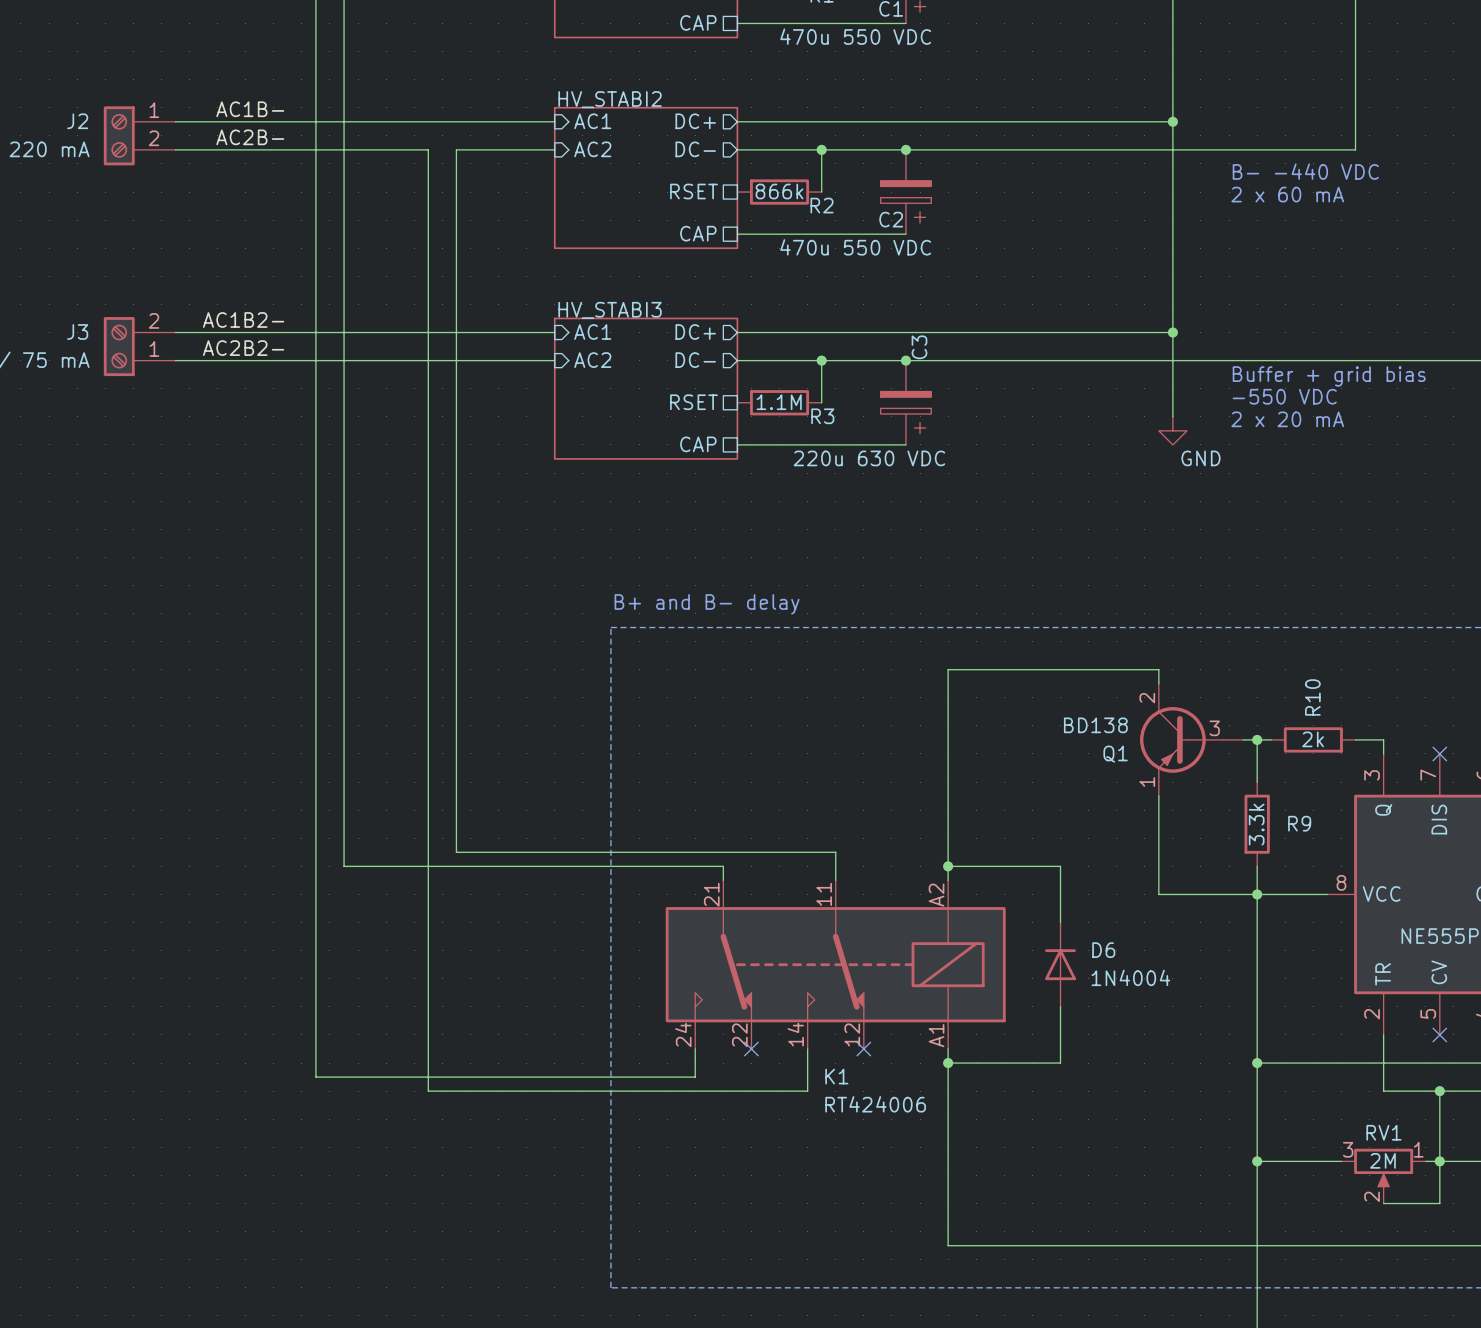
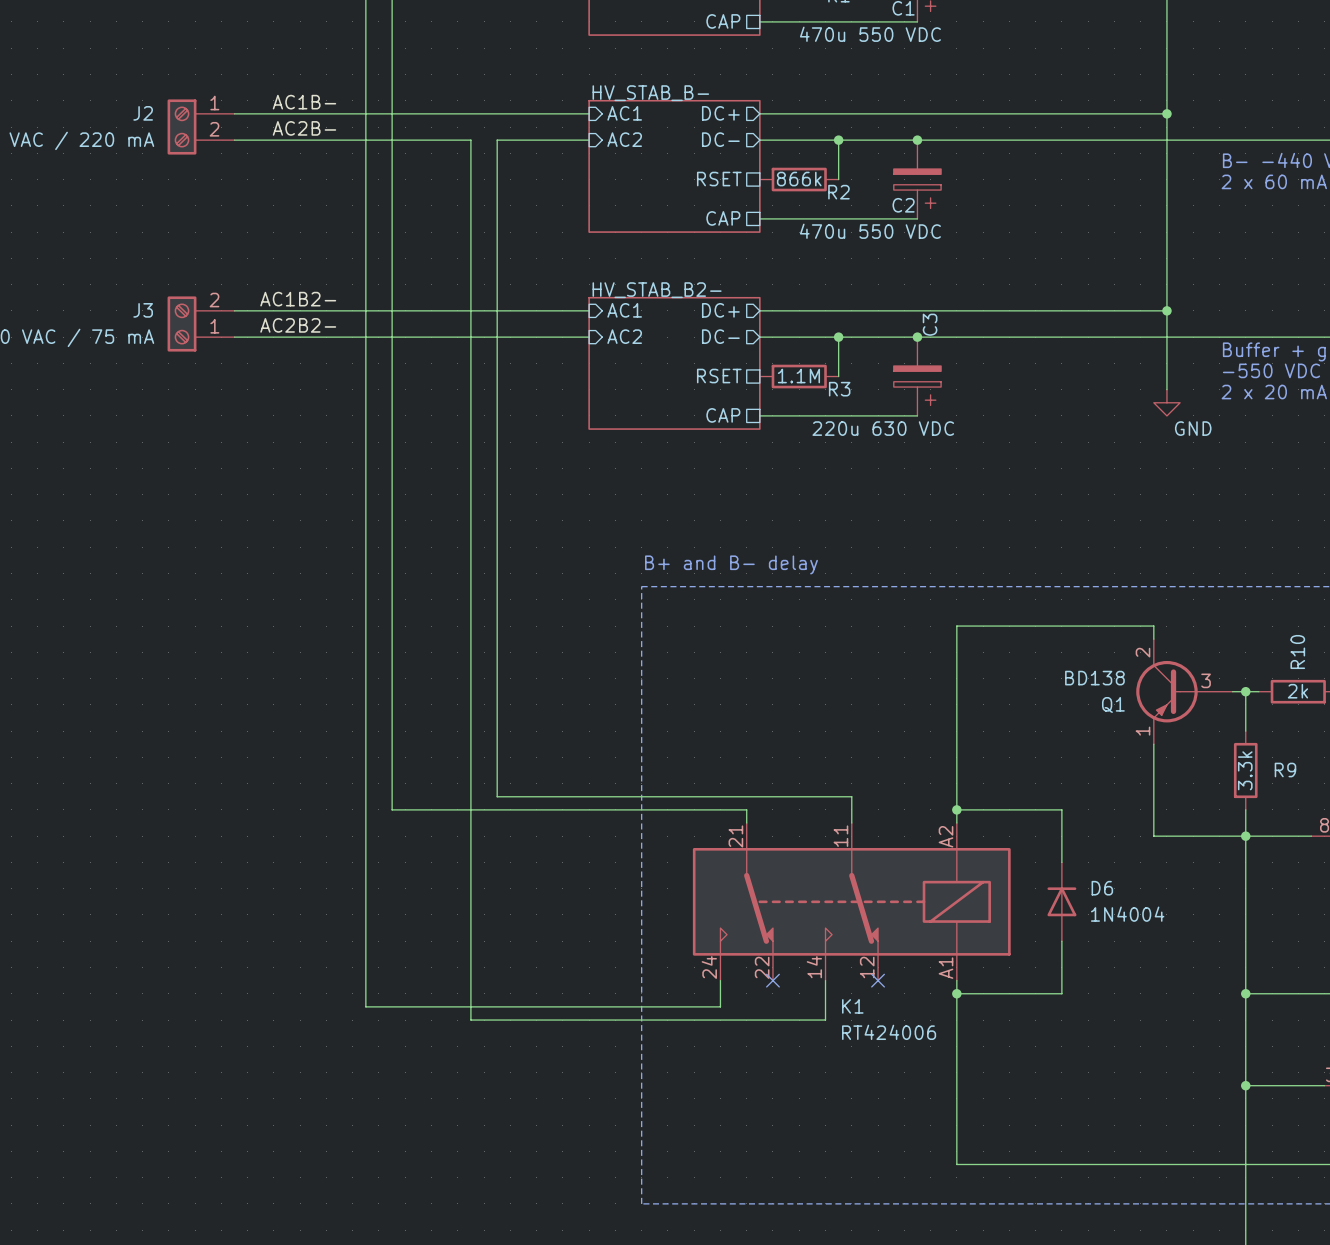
sheet HV_STABI2 name: HV_STABI2 (610, 99) -> HV_STAB_B- (650, 93)
sheet HV_STABI3 name: HV_STABI3 (610, 310) -> HV_STAB_B2- (657, 290)

